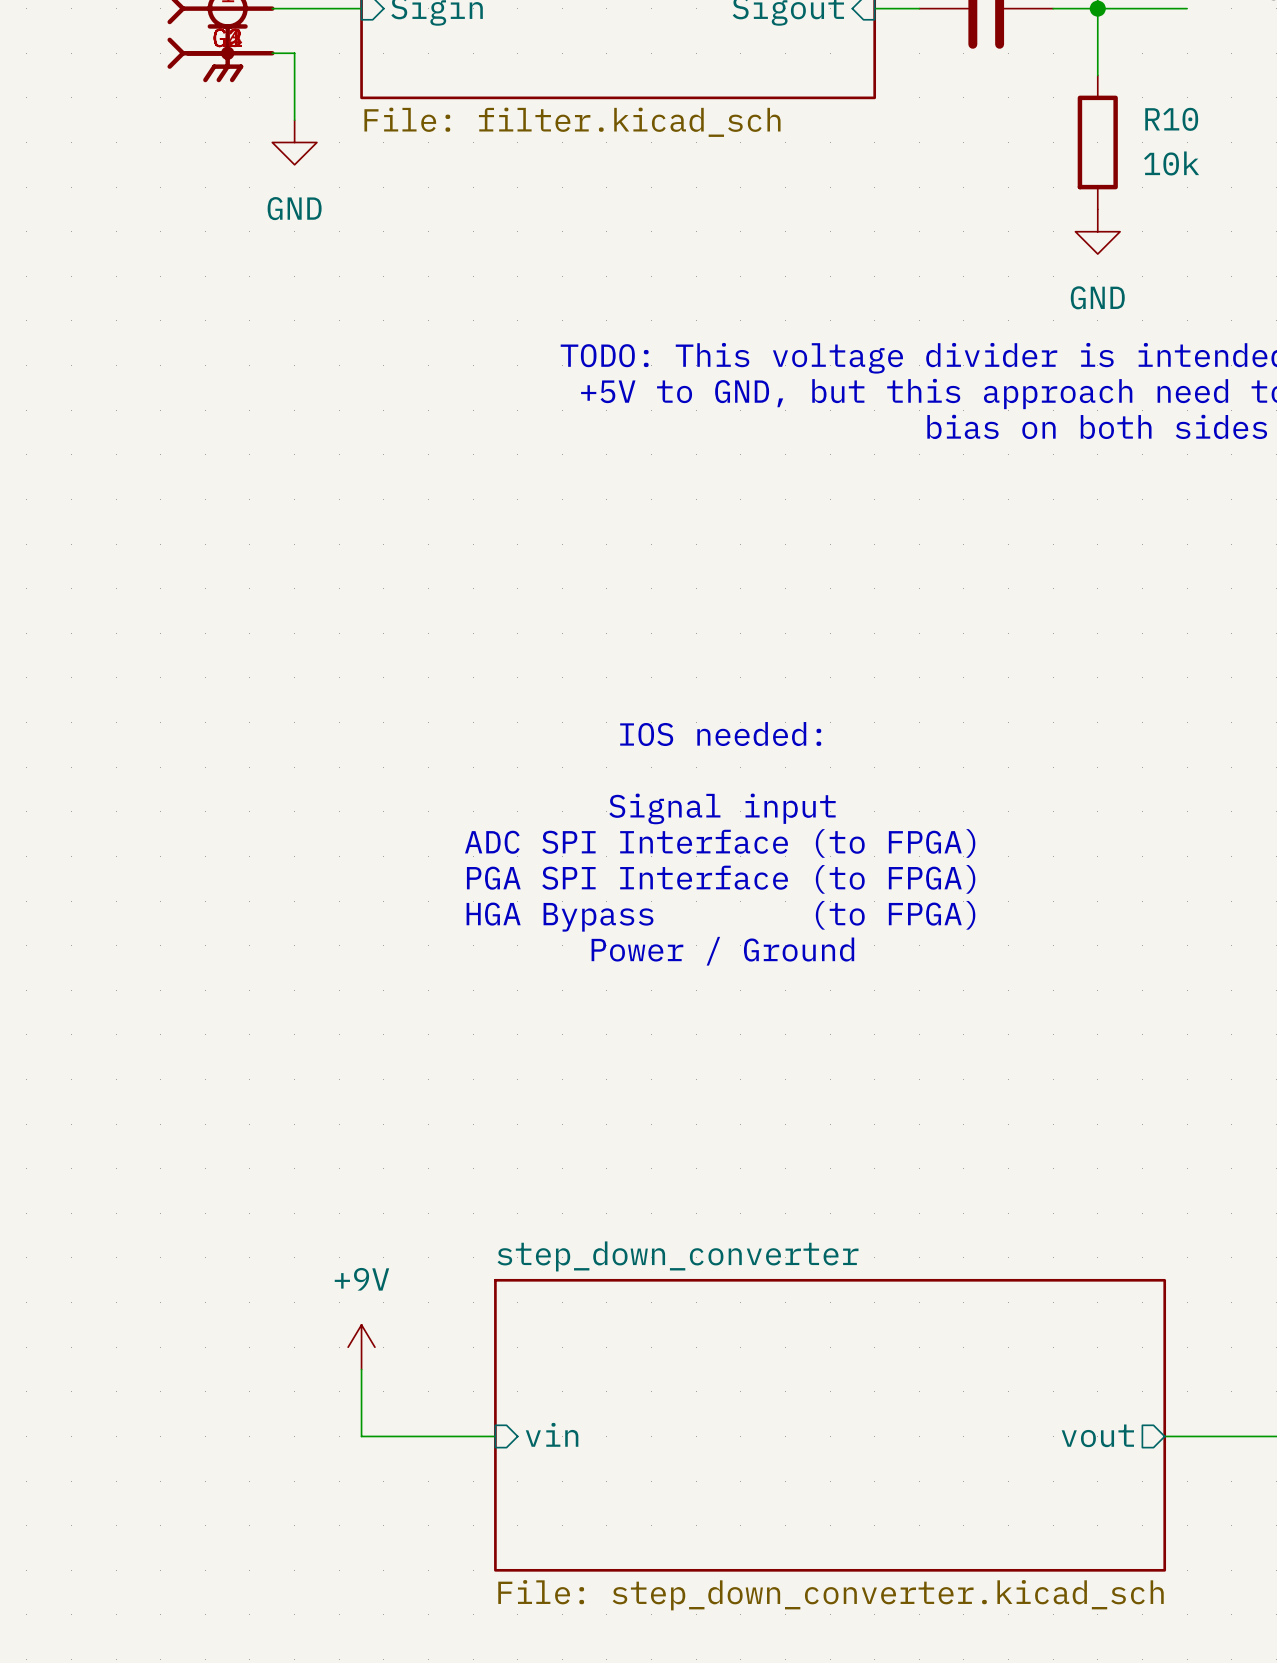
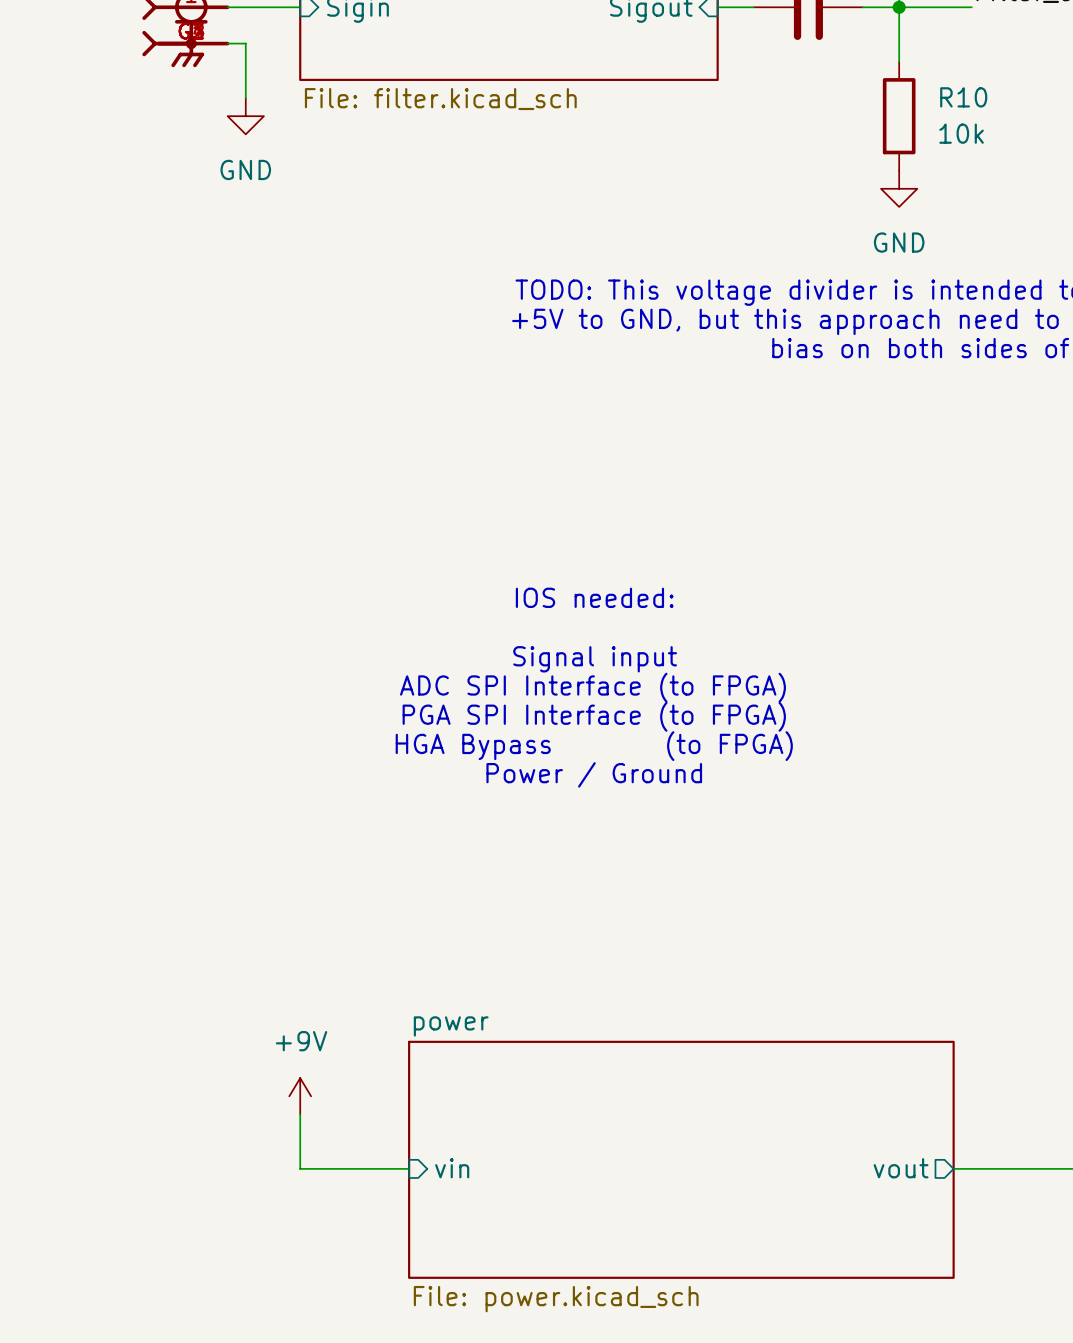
sheet step_down_converter name: step_down_converter (678, 1256) -> power (451, 1026)
sheet step_down_converter value: File: step_down_converter.kicad_sch (830, 1595) -> File: power.kicad_sch (556, 1299)

